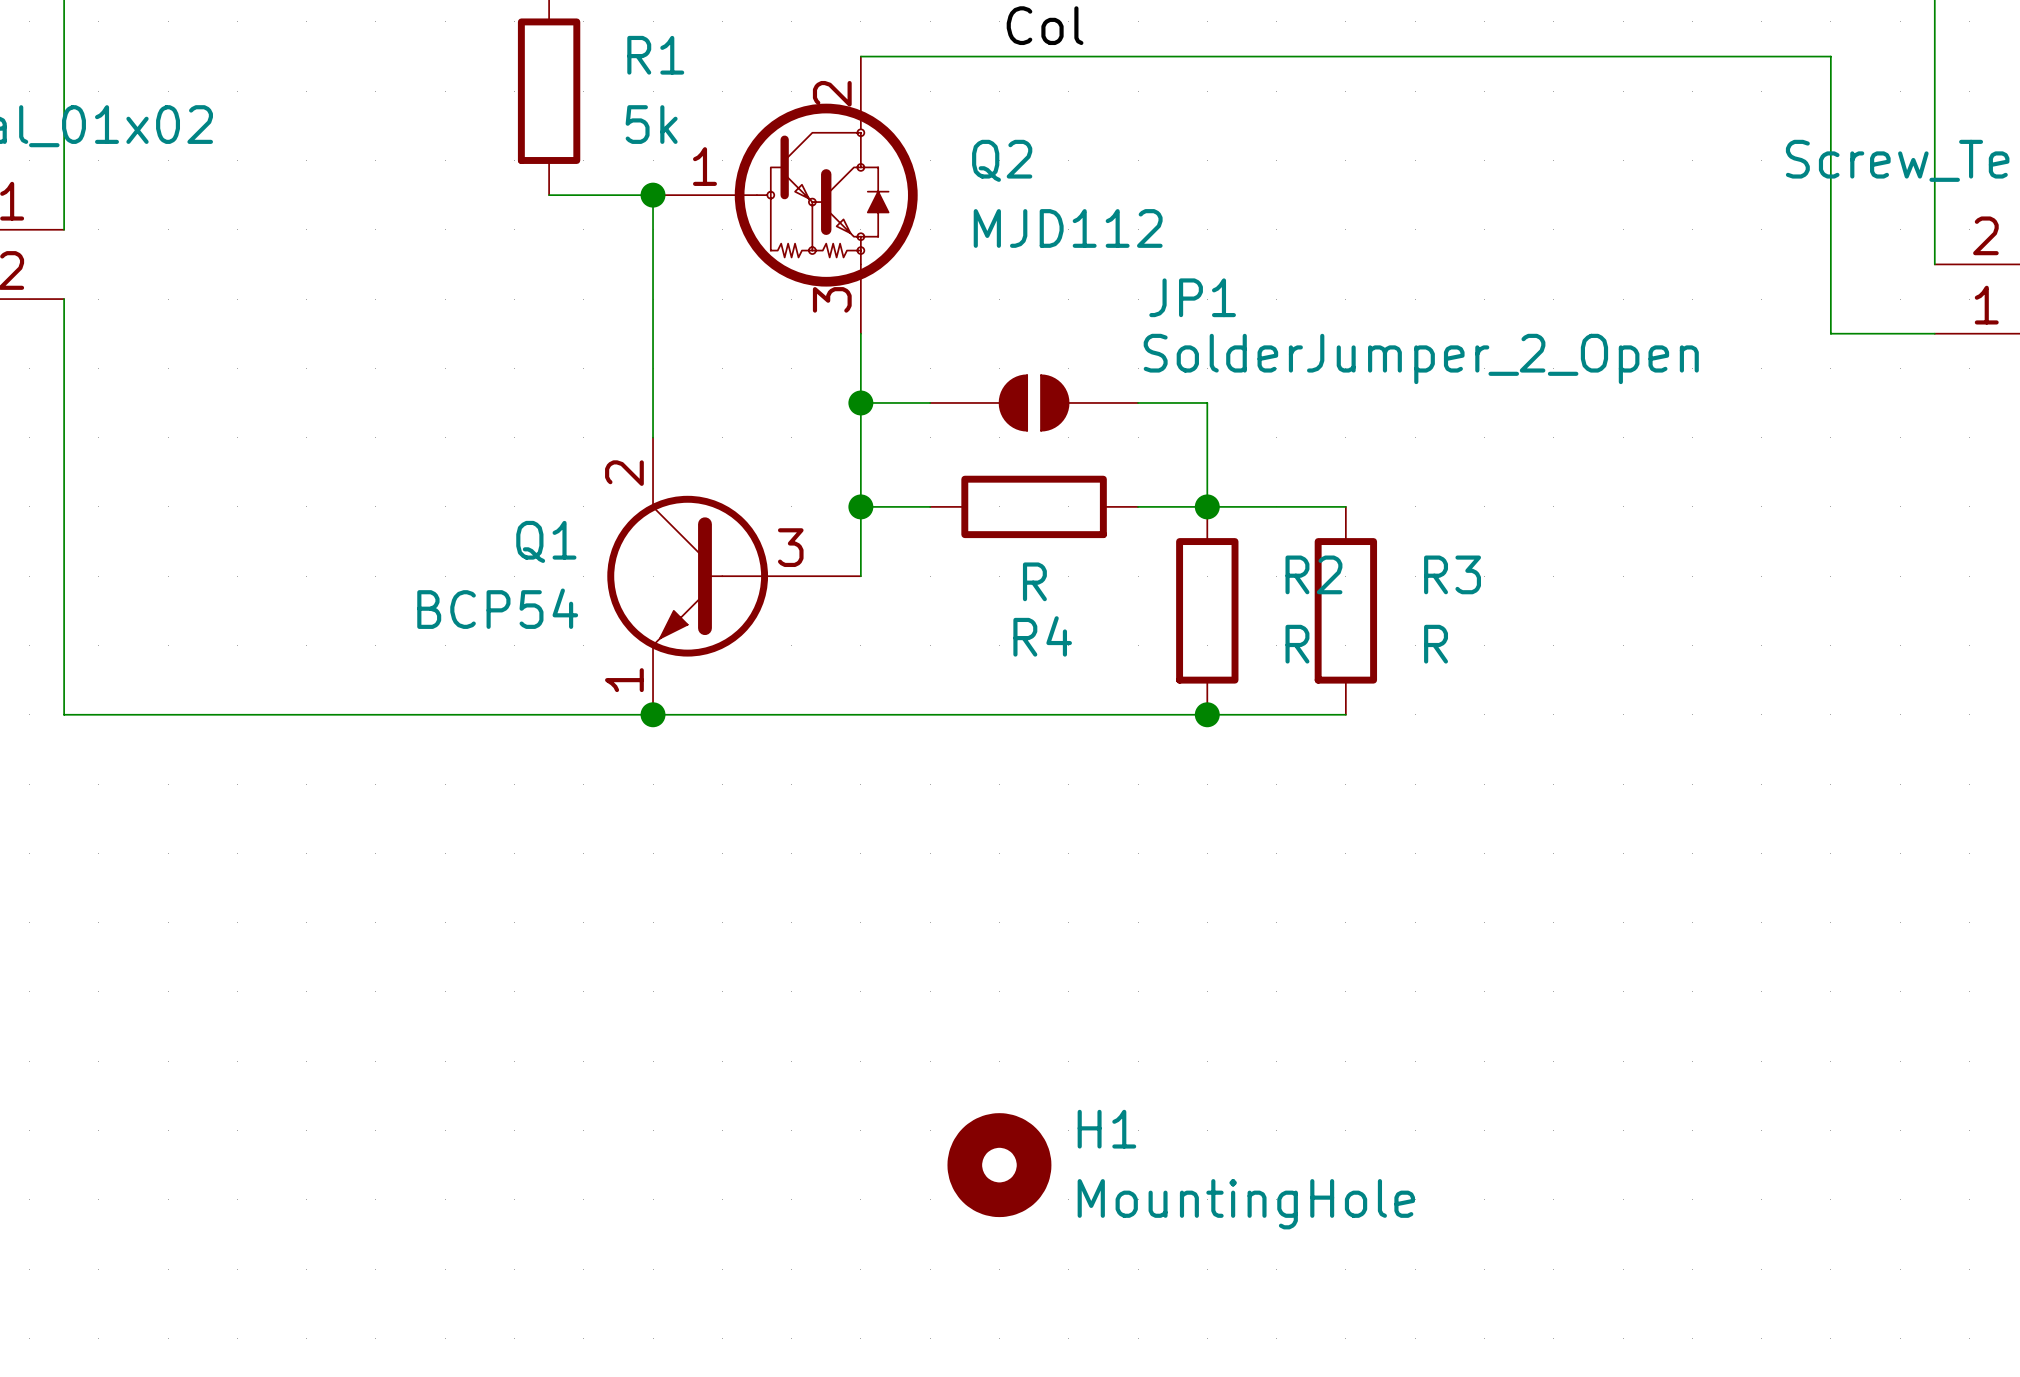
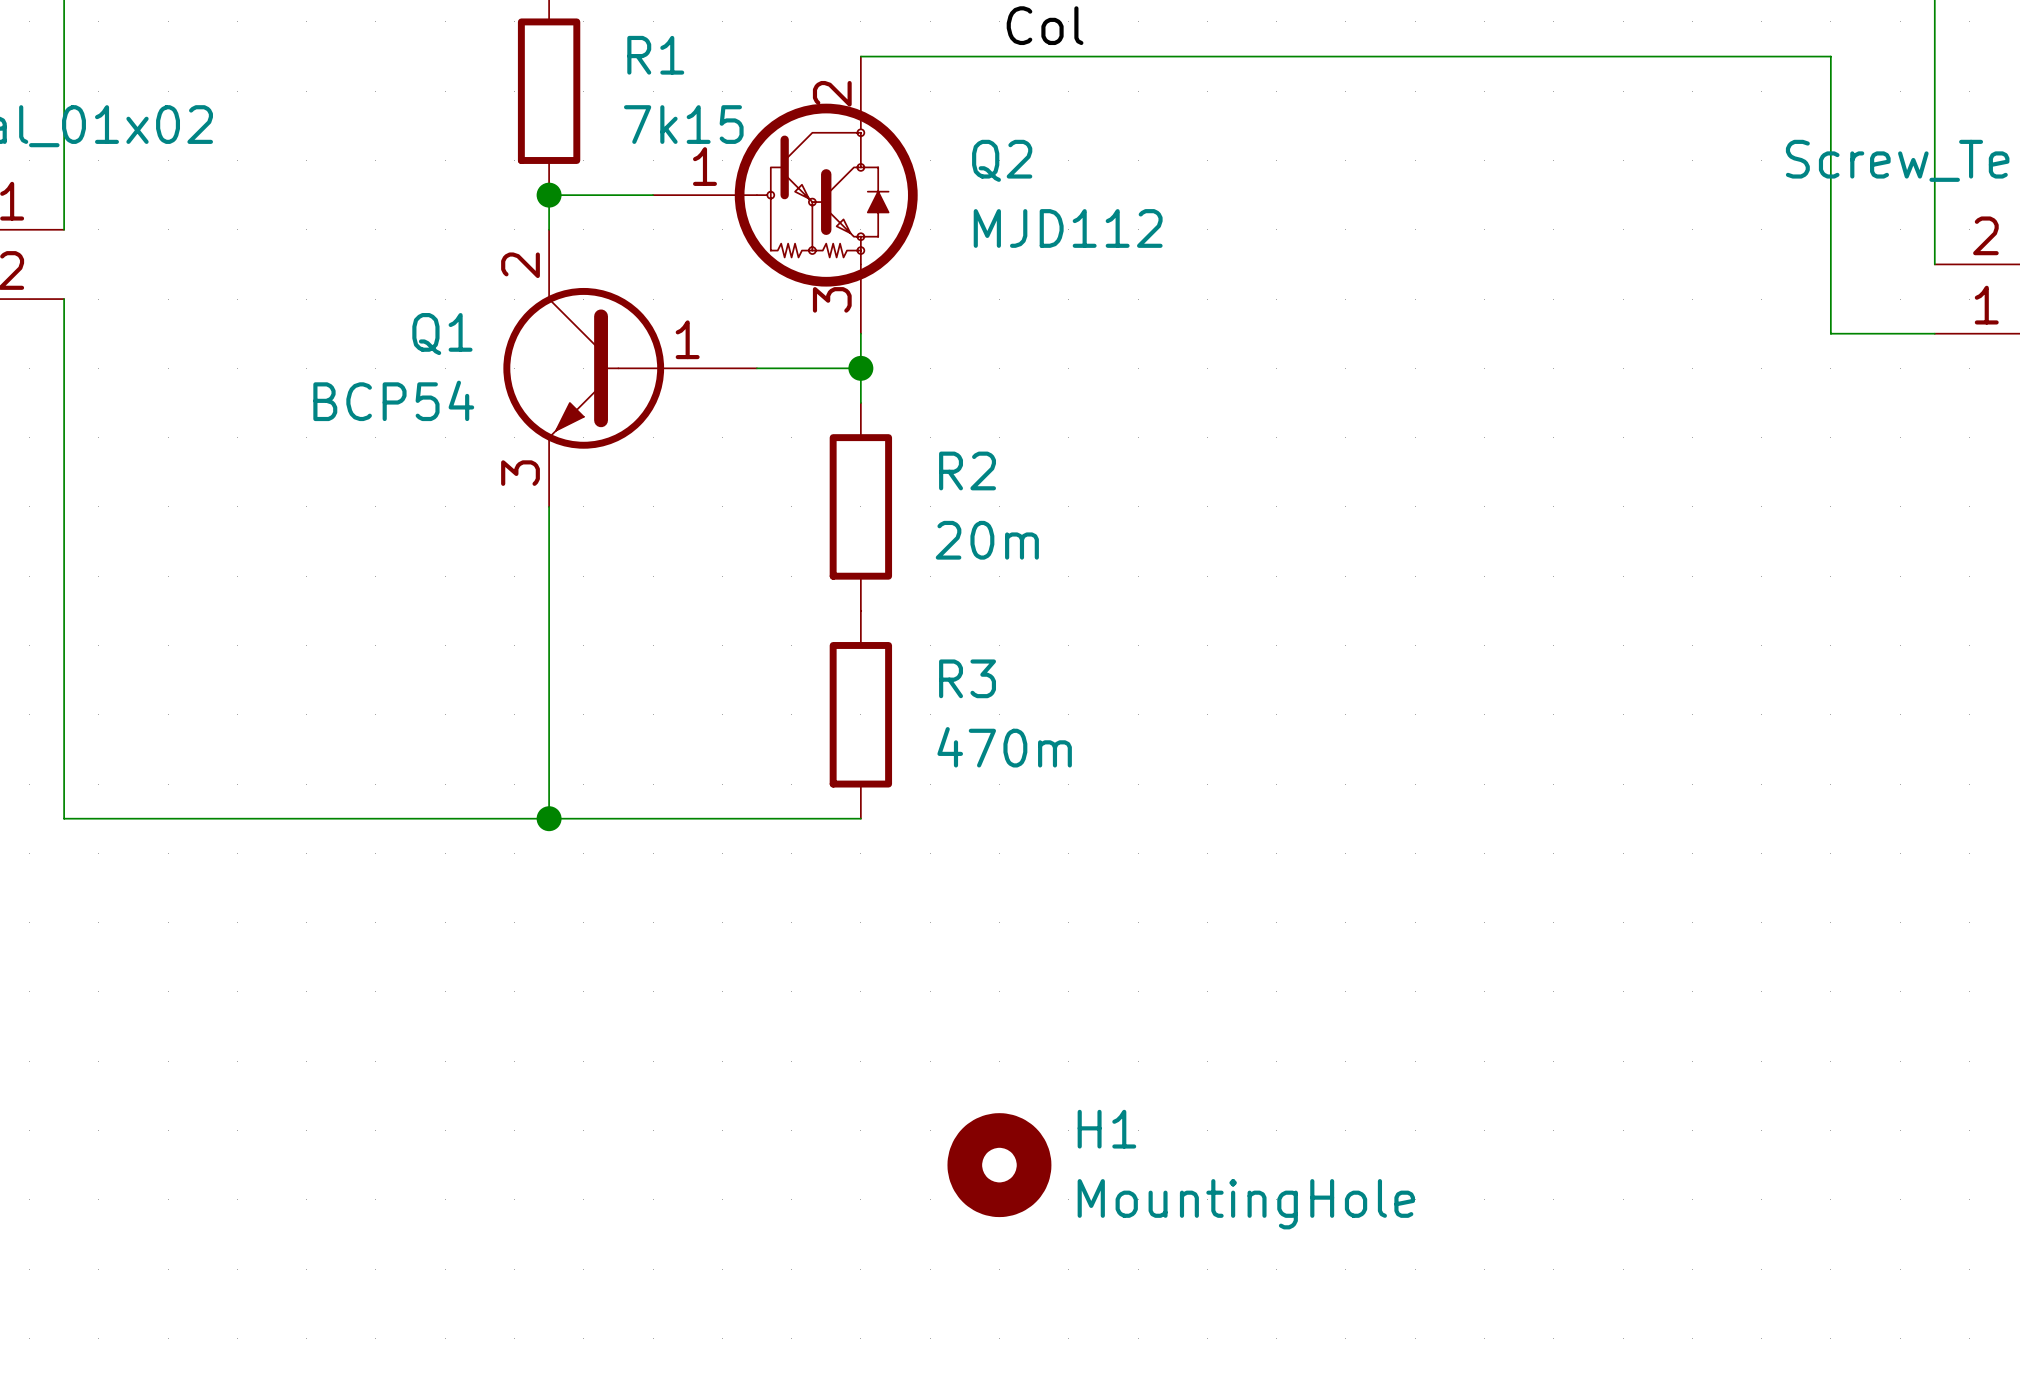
R1 value: 5k (651, 124) -> 7k15 (683, 124)
wire: none -> (549, 195) (549, 229)
wire: (653, 195) (653, 437) -> none
junction position: (653, 195) -> (549, 195)
wire: none -> (756, 368) (860, 368)
junction position: (860, 402) -> (860, 368)
wire: (930, 402) (860, 402) (860, 576) -> none
JP1: SolderJumper_2_Open (1034, 402) -> none
wire: (1138, 402) (1207, 402) (1207, 506) -> none
wire: none -> (549, 506) (549, 818)
wire: (860, 506) (930, 506) -> none
junction: (860, 506) -> none
R4: R (1034, 506) -> none
wire: (1138, 506) (1345, 506) -> none
junction: (1207, 506) -> none
Q1 pin number: 3 (790, 547) -> 1 (687, 339)
Q1 position: (734, 576) -> (630, 368)
R2 position: (1207, 610) -> (860, 506)
R3 position: (1345, 610) -> (860, 714)
R2 value: R (1297, 644) -> 20m (987, 540)
R3 value: R (1436, 644) -> 470m (1004, 747)
Q1 pin number: 1 (624, 680) -> 3 (520, 473)
wire: (64, 714) (1345, 714) -> (64, 714) (64, 818) (860, 818)
junction position: (653, 714) -> (549, 818)
junction: (1207, 714) -> none

